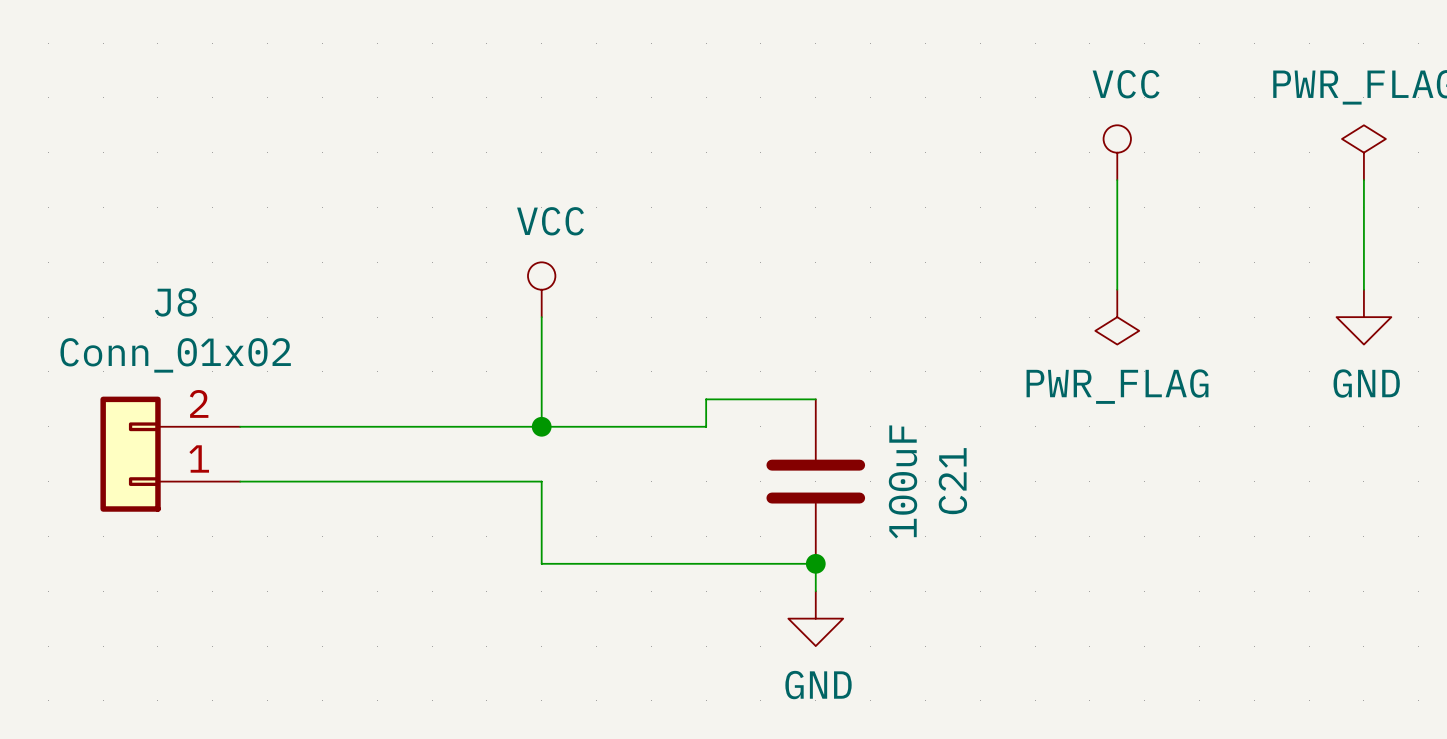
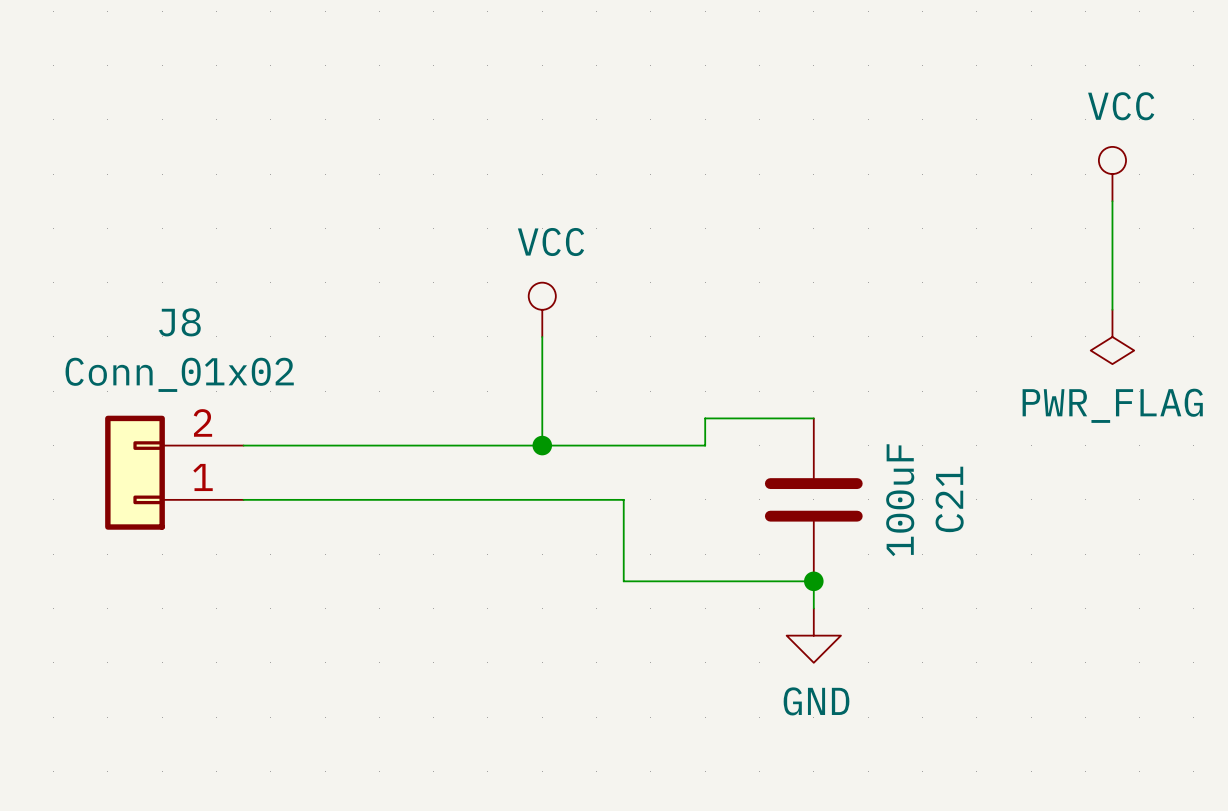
wire: (541, 481) (541, 563) (623, 563) -> (542, 499) (623, 499) (623, 581)

